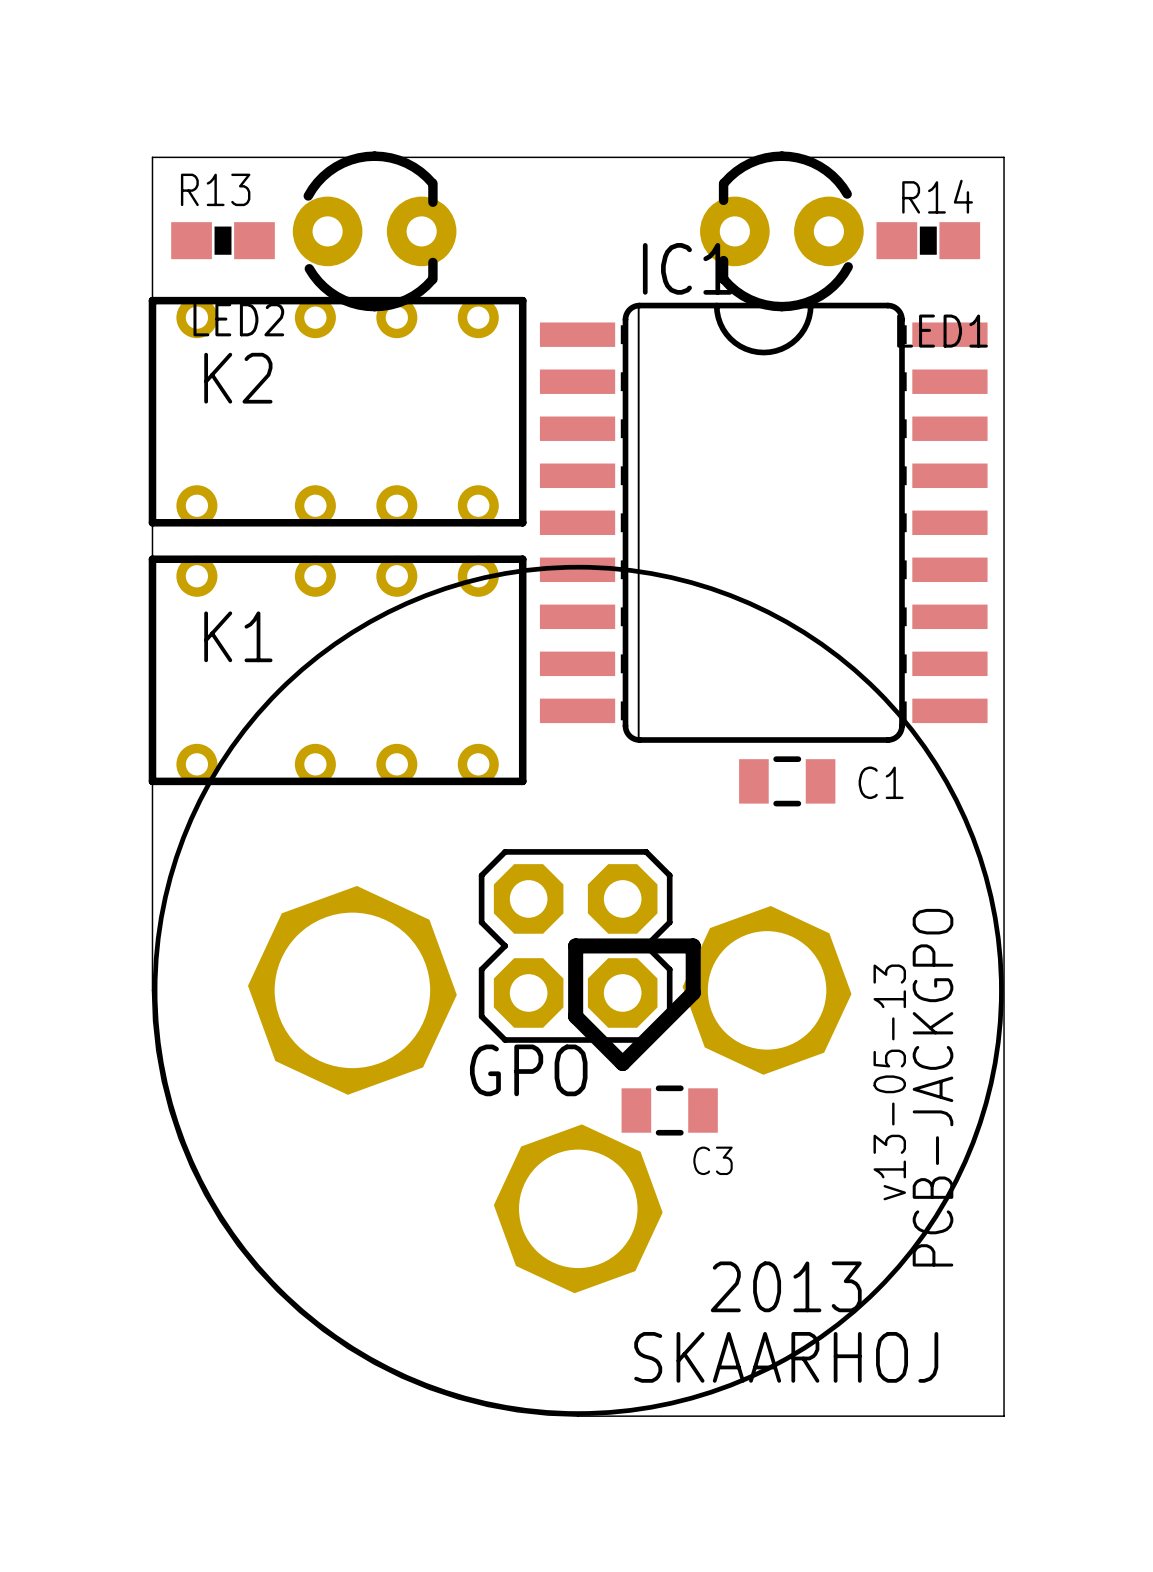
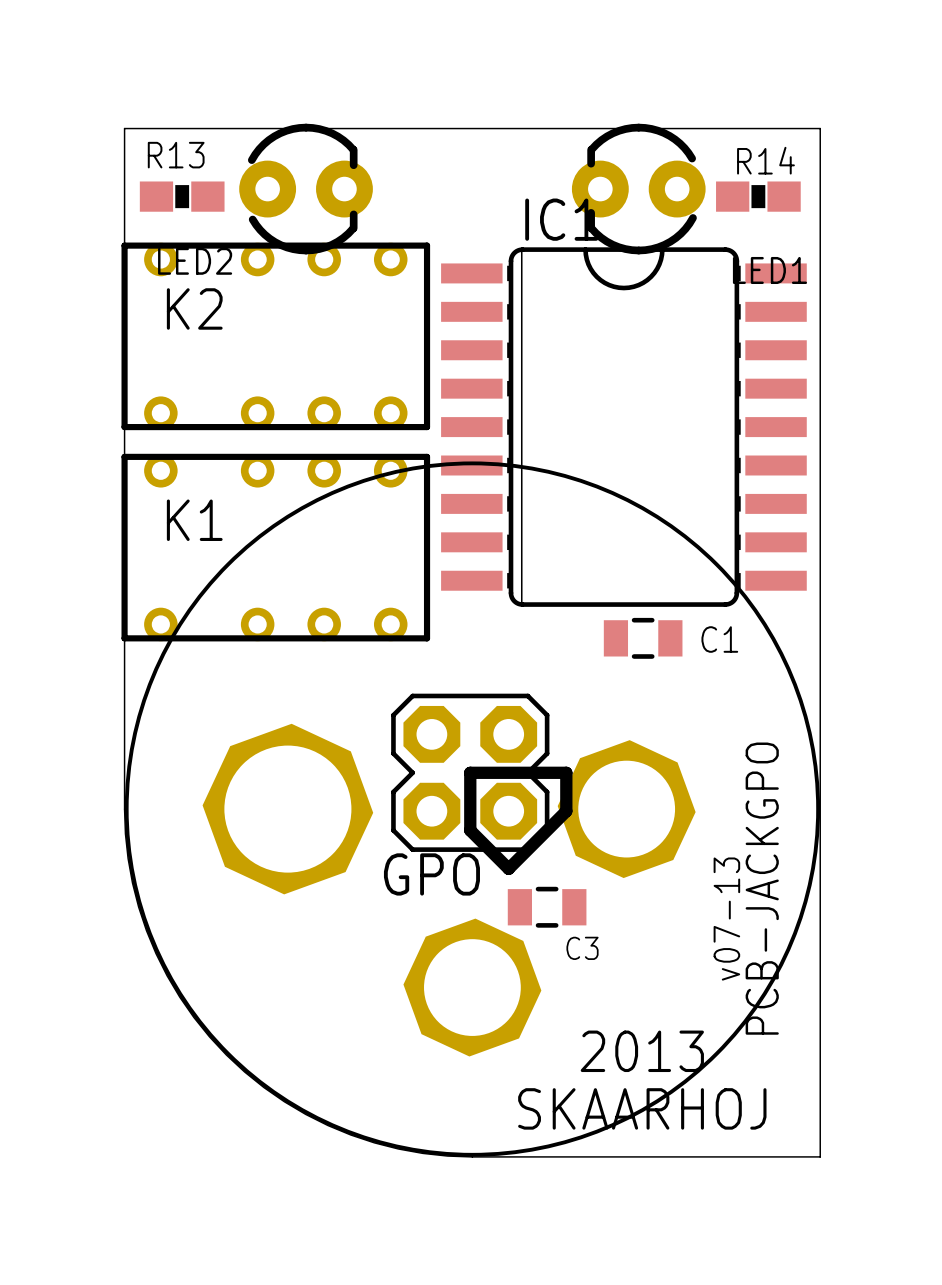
text: v13-05-13 (889, 1082) -> v07-13 (726, 919)

